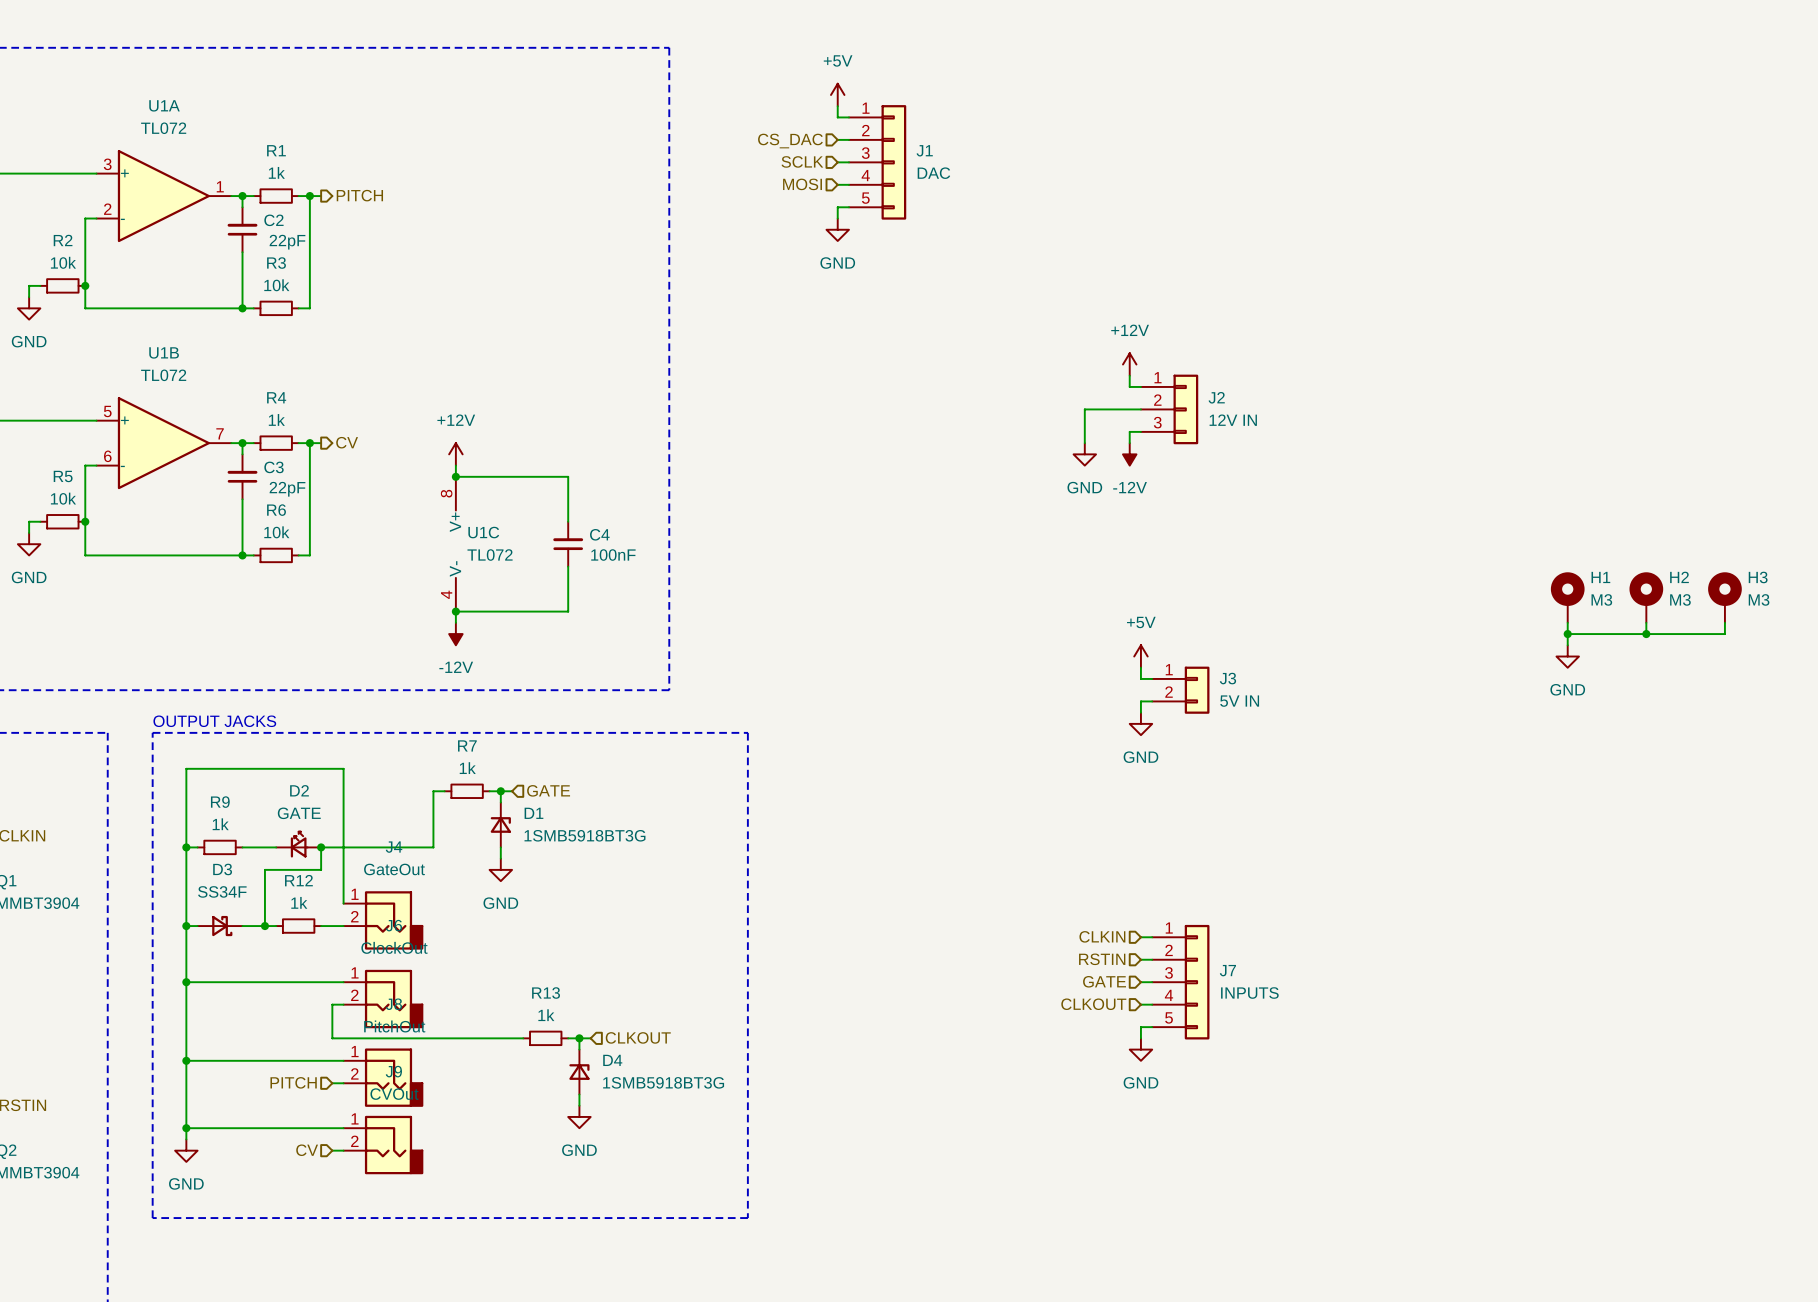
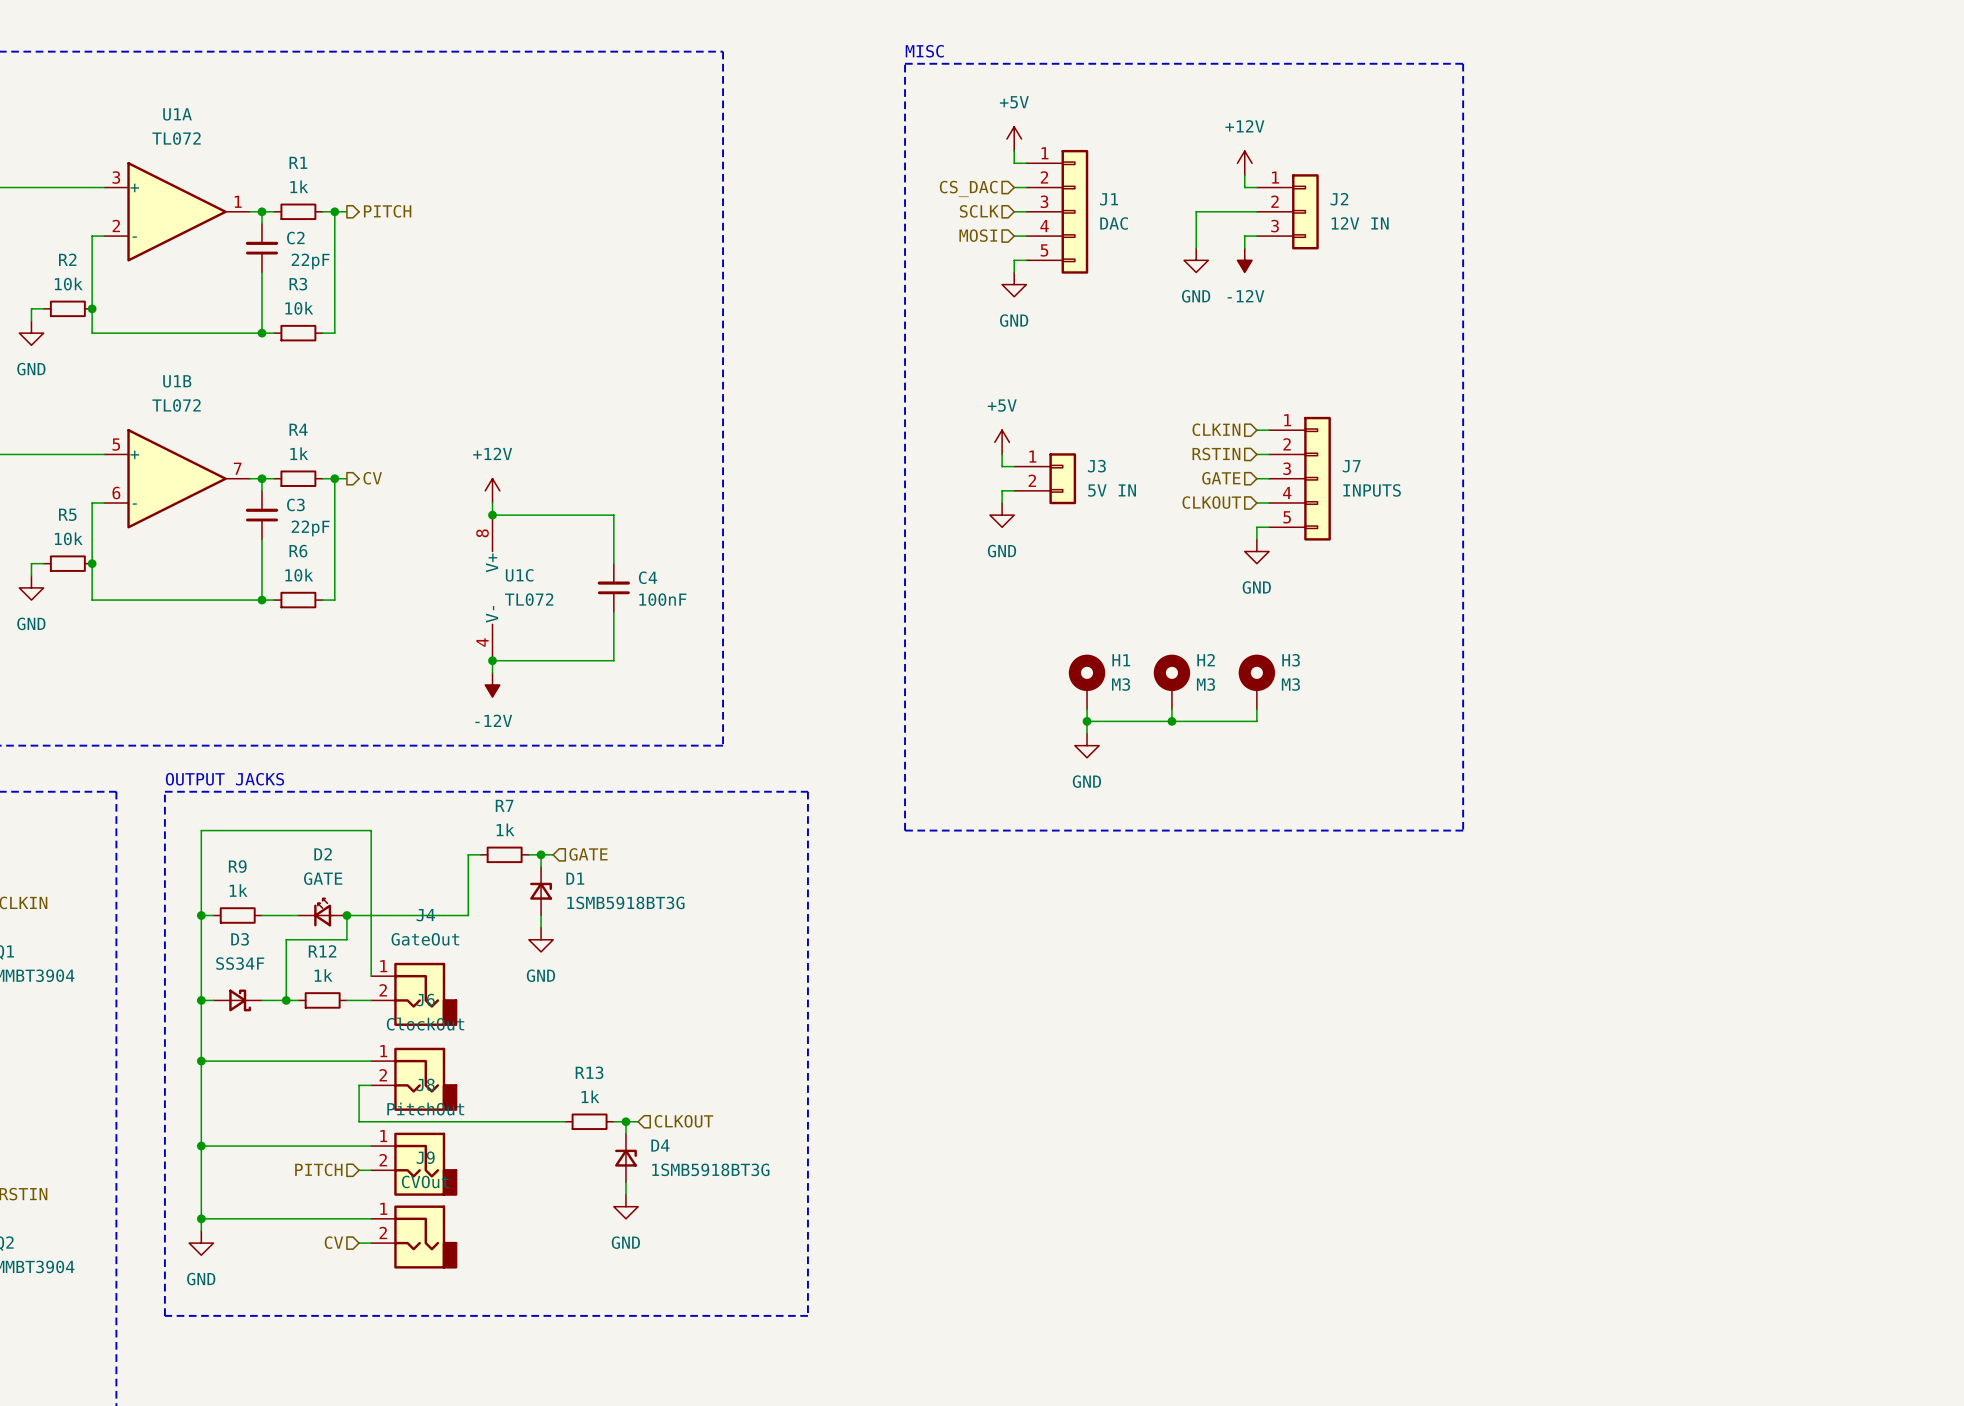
text: none -> MISC (924, 51)
line: none -> (905, 63) (1463, 63) (1463, 830) (905, 830) (905, 63)
power symbol position: +5V (837, 94) -> +5V (1014, 139)
wire: (837, 106) (837, 117) (848, 117) -> (1014, 151) (1014, 163) (1026, 163)
wire: (837, 139) (848, 139) -> (1014, 187) (1026, 187)
hierarchical label position: CS_DAC (790, 141) -> CS_DAC (968, 188)
hierarchical label position: SCLK (802, 161) -> SCLK (979, 211)
wire: (837, 162) (848, 162) -> (1014, 211) (1026, 211)
J1 position: (877, 162) -> (1057, 211)
hierarchical label position: MOSI (802, 184) -> MOSI (978, 235)
wire: (837, 184) (848, 184) -> (1014, 236) (1026, 236)
wire: (848, 207) (837, 207) (837, 218) -> (1026, 260) (1014, 260) (1014, 272)
power symbol position: GND (837, 229) -> GND (1014, 284)
power symbol: none -> GND (1196, 260)
power symbol position: +12V (1129, 364) -> +12V (1244, 163)
wire: (1129, 375) (1129, 386) (1140, 386) -> (1244, 175) (1244, 187) (1256, 187)
hierarchical label: none -> CLKIN (1216, 429)
wire: none -> (1256, 430) (1269, 430)
power symbol: none -> +5V (1002, 442)
wire: (1140, 409) (1084, 409) (1084, 443) -> (1256, 211) (1196, 211) (1196, 248)
J2 position: (1169, 409) -> (1287, 211)
wire: none -> (1002, 454) (1002, 466) (1014, 466)
hierarchical label: none -> RSTIN (1216, 454)
wire: none -> (1256, 454) (1269, 454)
wire: (1140, 431) (1129, 431) (1129, 443) -> (1256, 236) (1244, 236) (1244, 248)
hierarchical label: none -> GATE (1221, 478)
wire: none -> (1256, 478) (1269, 478)
wire: none -> (1014, 490) (1002, 490) (1002, 502)
power symbol: GND (1084, 454) -> none
power symbol position: -12V (1129, 454) -> -12V (1244, 260)
hierarchical label: none -> CLKOUT (1211, 502)
wire: none -> (1256, 502) (1269, 502)
power symbol: none -> GND (1002, 515)
power symbol: none -> GND (1256, 551)
H1 position: (1567, 597) -> (1087, 681)
H2 position: (1646, 597) -> (1171, 681)
H3 position: (1724, 597) -> (1256, 681)
wire: (1567, 622) (1567, 645) -> none
wire: (1646, 622) (1646, 634) -> none
wire: (1724, 622) (1724, 634) (1567, 634) -> none
junction: (1567, 634) -> none
junction: (1646, 634) -> none
wire: none -> (1087, 709) (1087, 733)
wire: none -> (1171, 709) (1171, 721)
power symbol: +5V (1140, 656) -> none
wire: none -> (1256, 709) (1256, 721) (1087, 721)
power symbol: GND (1567, 656) -> none
junction: none -> (1087, 721)
junction: none -> (1171, 721)
wire: (1140, 667) (1140, 678) (1152, 678) -> none
power symbol: none -> GND (1087, 745)
J3 position: (1180, 690) -> (1045, 478)
wire: (1152, 701) (1140, 701) (1140, 712) -> (1269, 527) (1256, 527) (1256, 539)
power symbol: GND (1140, 723) -> none
hierarchical label: CLKIN (1102, 936) -> none
wire: (1140, 937) (1152, 937) -> none
hierarchical label: RSTIN (1102, 959) -> none
wire: (1140, 959) (1152, 959) -> none
hierarchical label: GATE (1104, 981) -> none
wire: (1140, 982) (1152, 982) -> none
J7 position: (1180, 982) -> (1299, 478)
hierarchical label: CLKOUT (1093, 1004) -> none
wire: (1140, 1004) (1152, 1004) -> none
wire: (1152, 1027) (1140, 1027) (1140, 1038) -> none
power symbol: GND (1140, 1049) -> none

